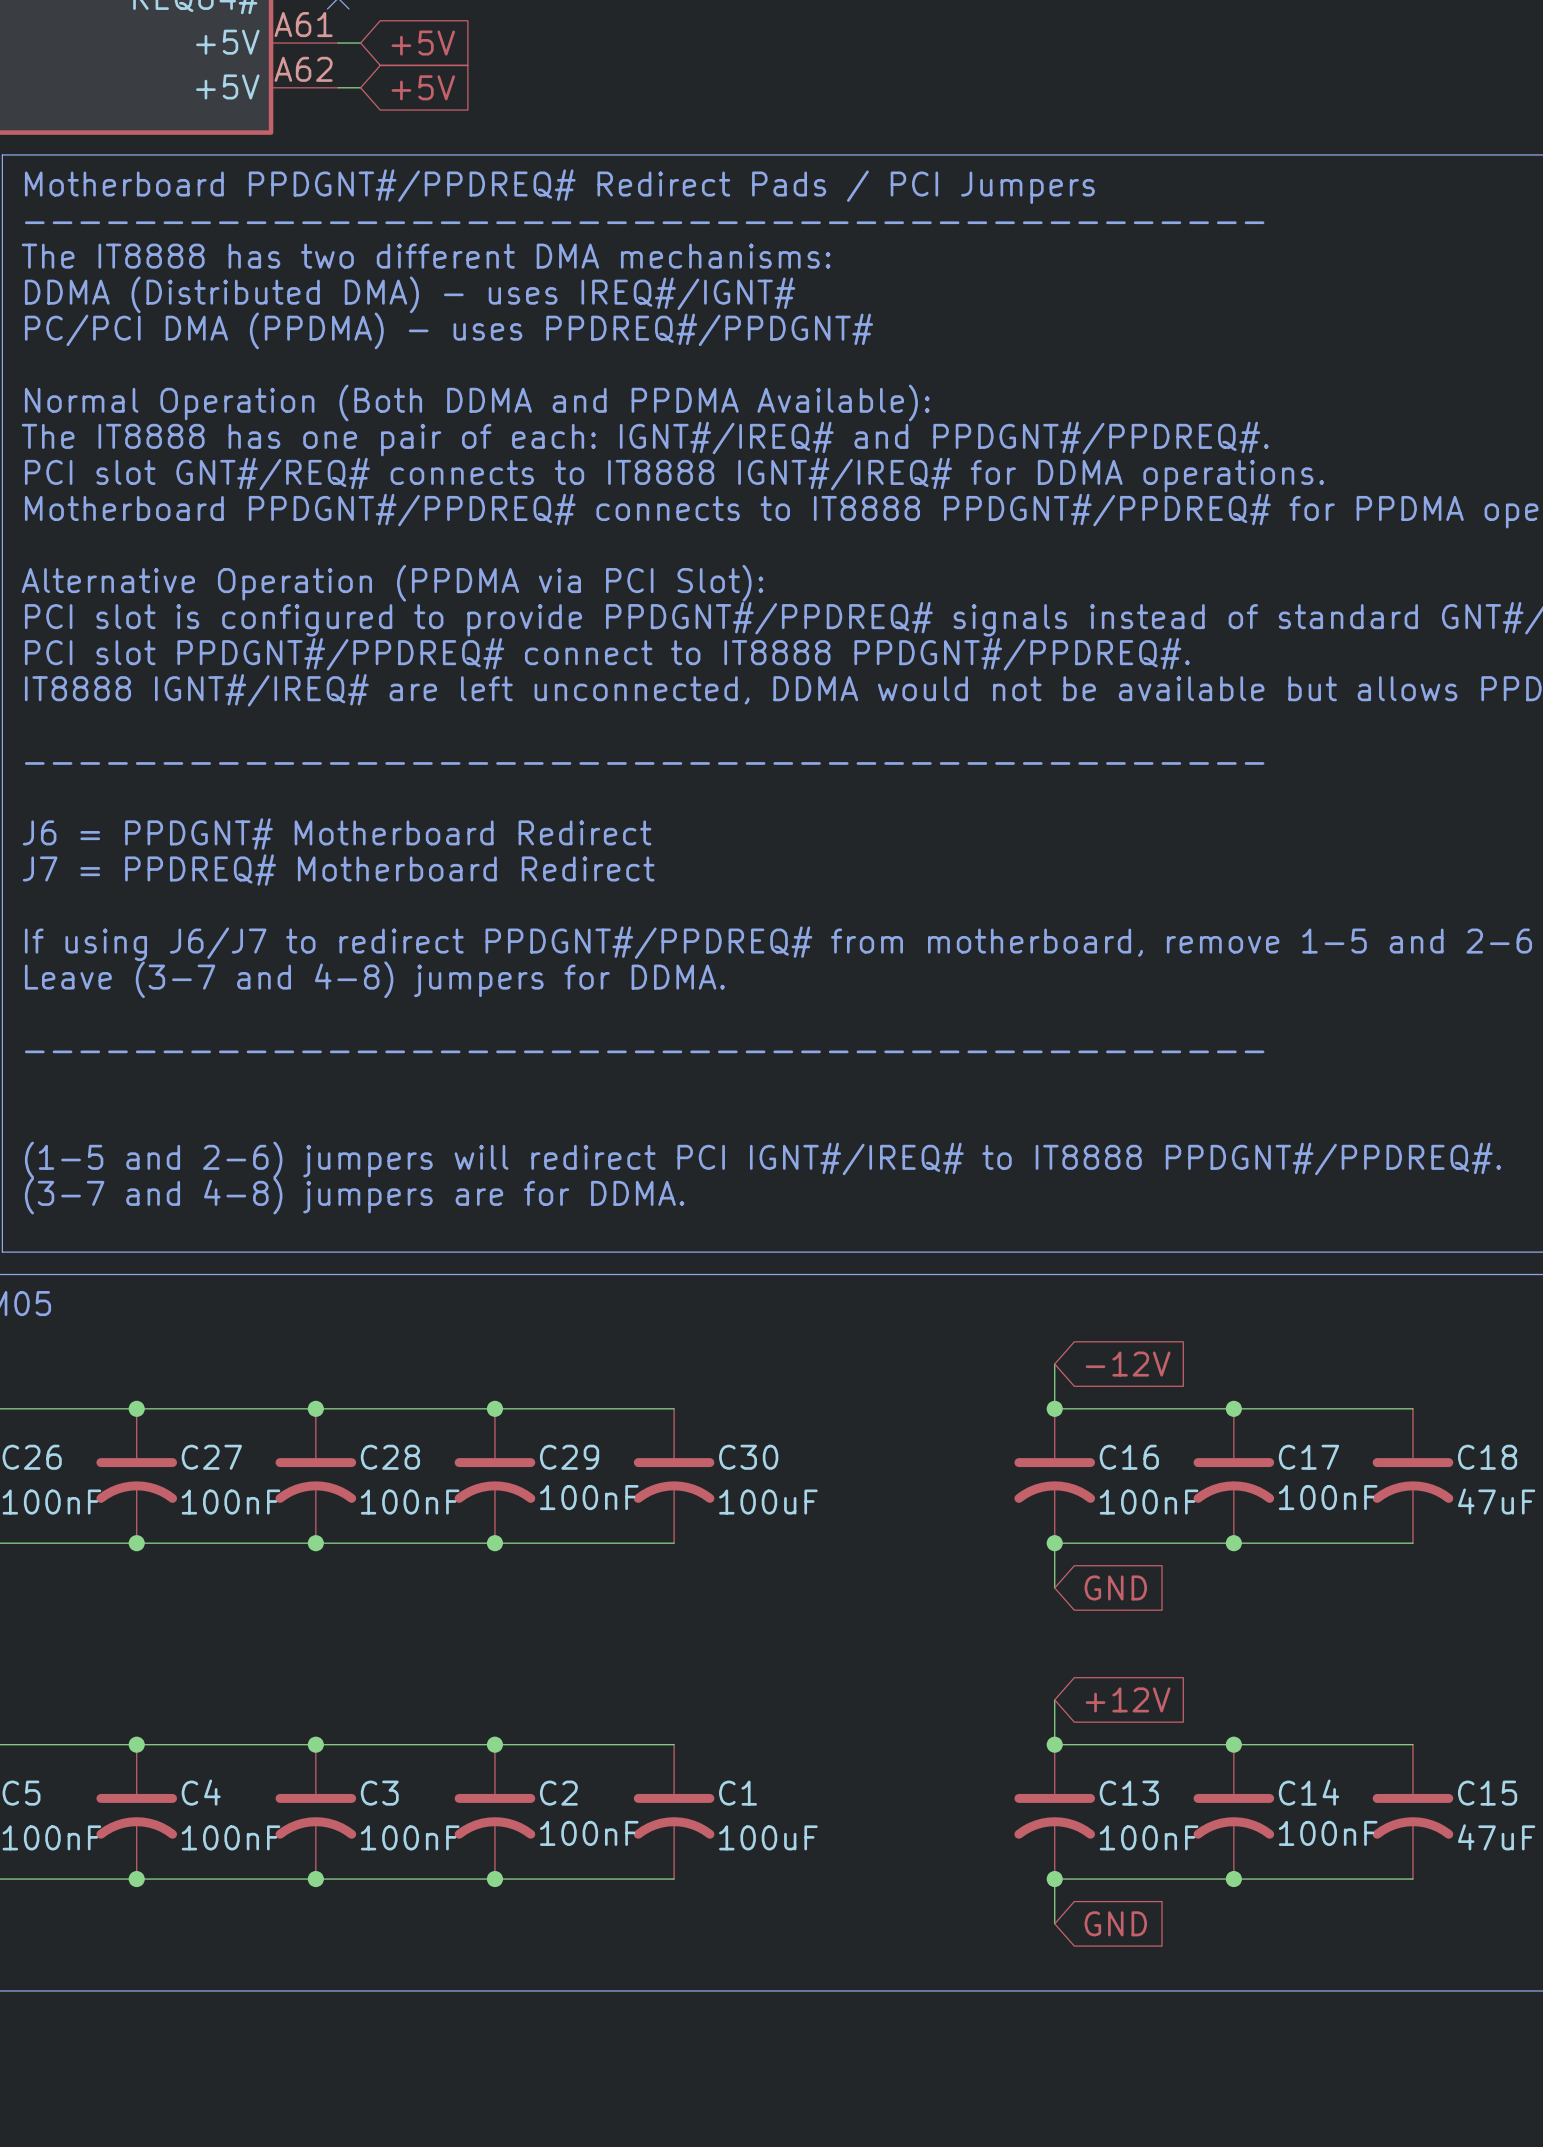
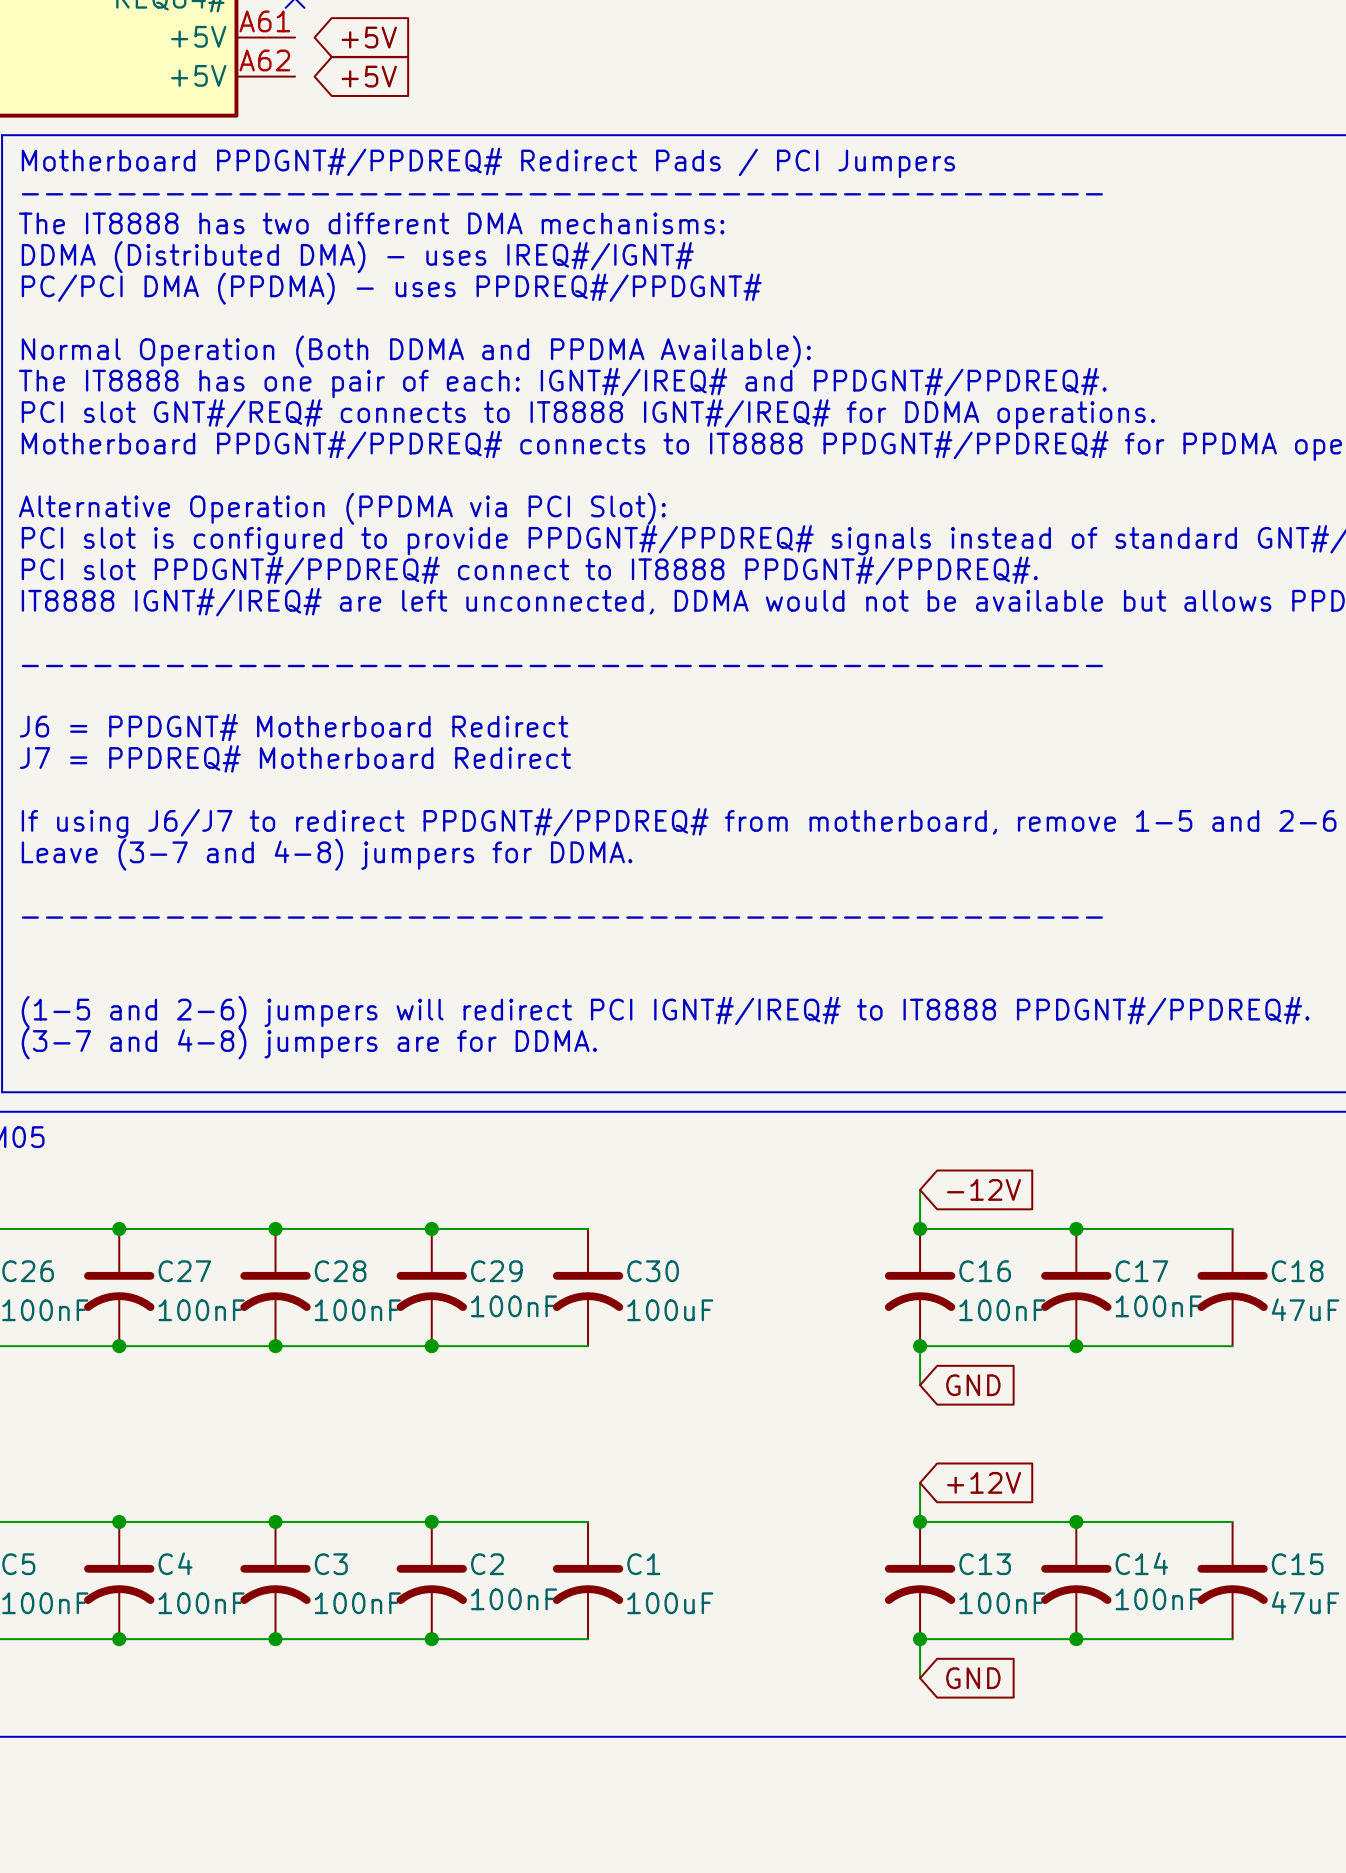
wire: (338, 43) (360, 43) -> none
wire: (338, 87) (360, 87) -> none

